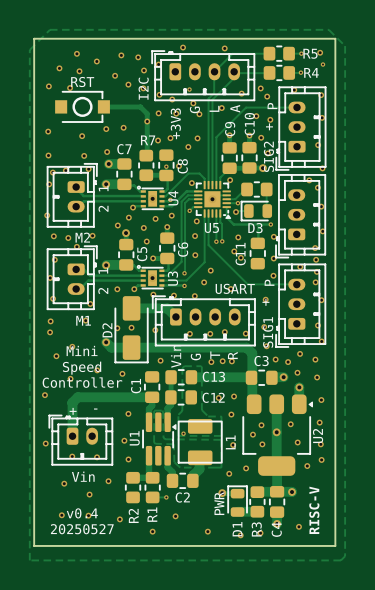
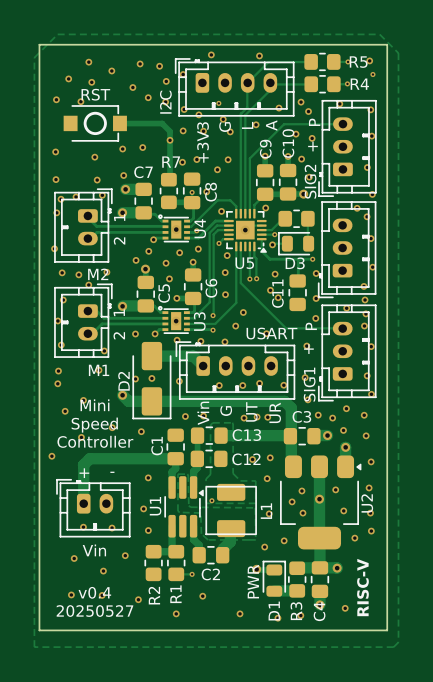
text: T (215, 355) -> UT (251, 411)
text: R (232, 355) -> UR (275, 412)
via: none -> (203, 416)
via: (45, 443) -> none

